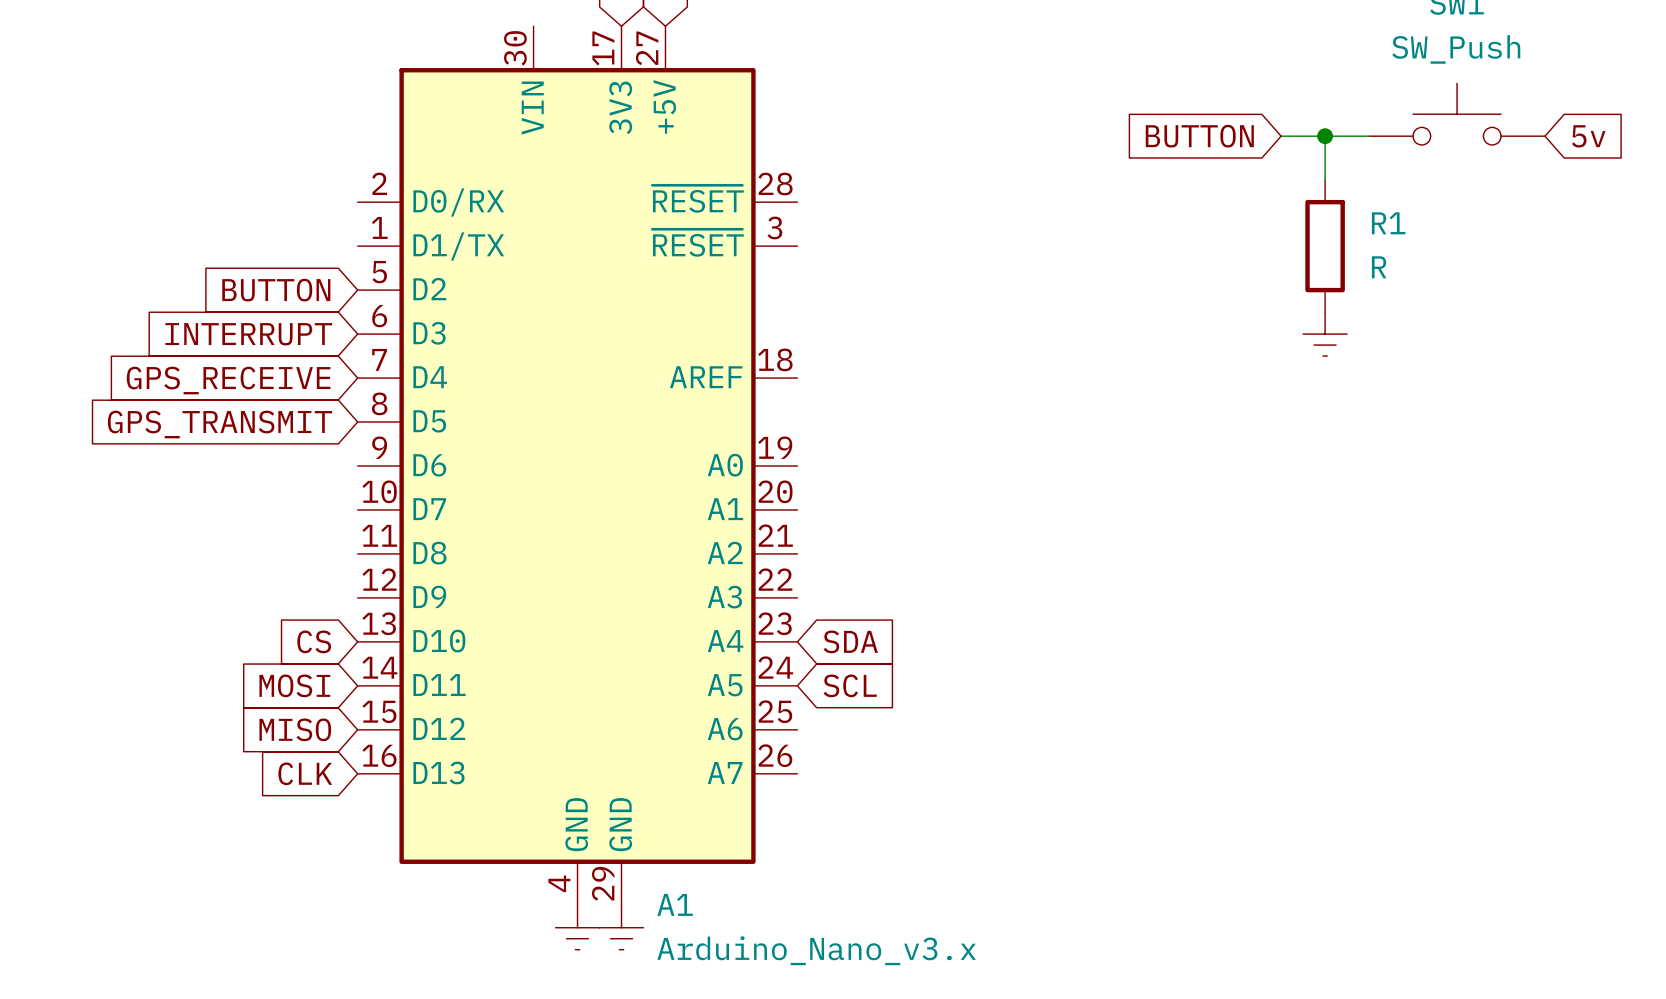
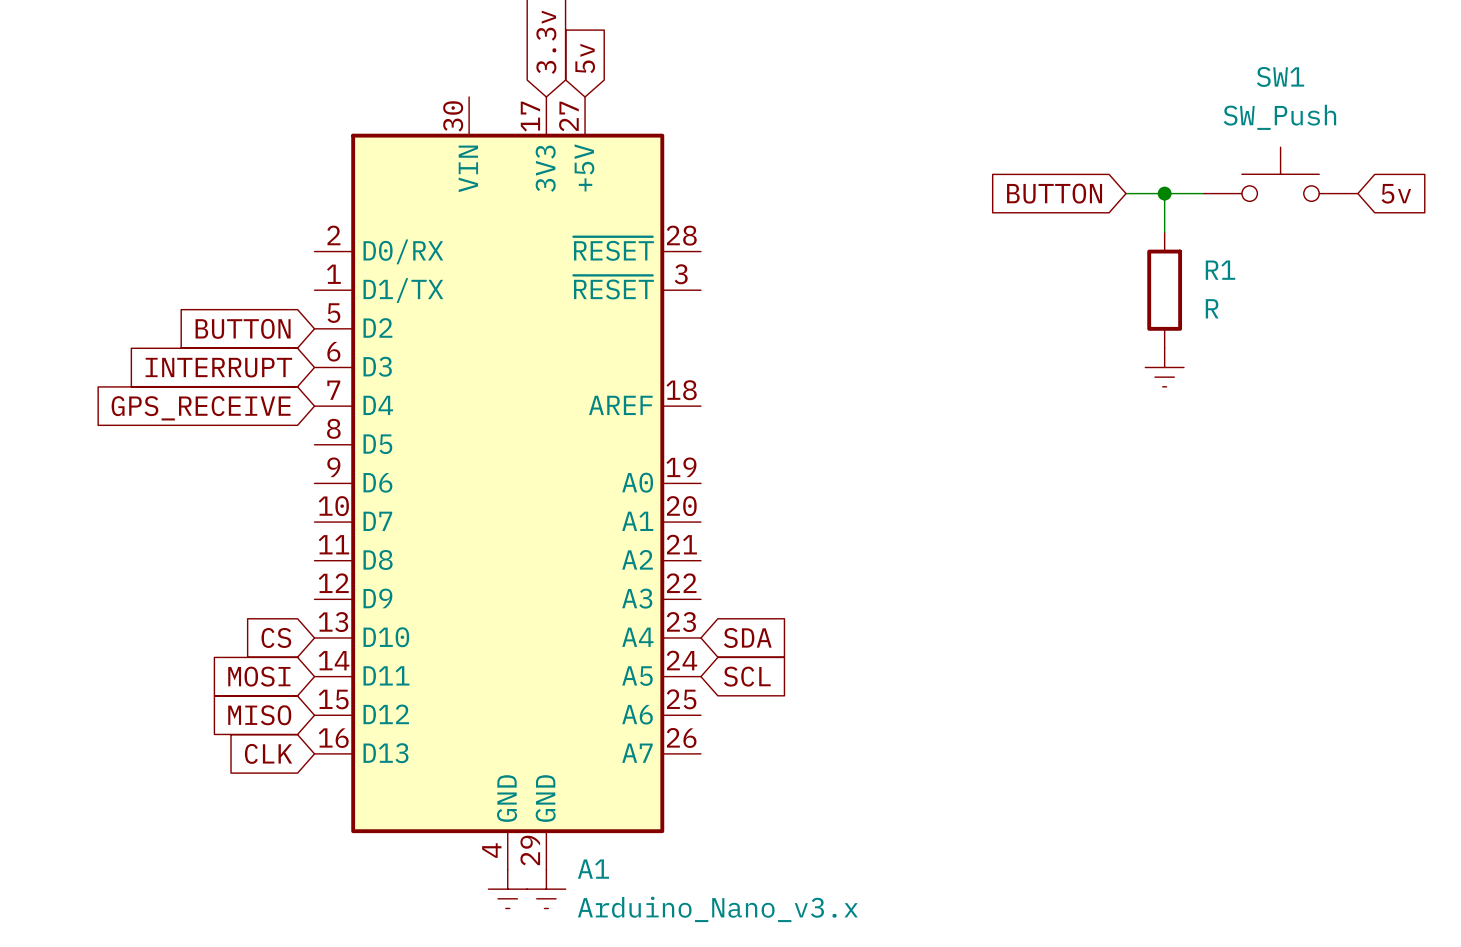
global label: GPS_TRANSMIT (219, 424) -> none

